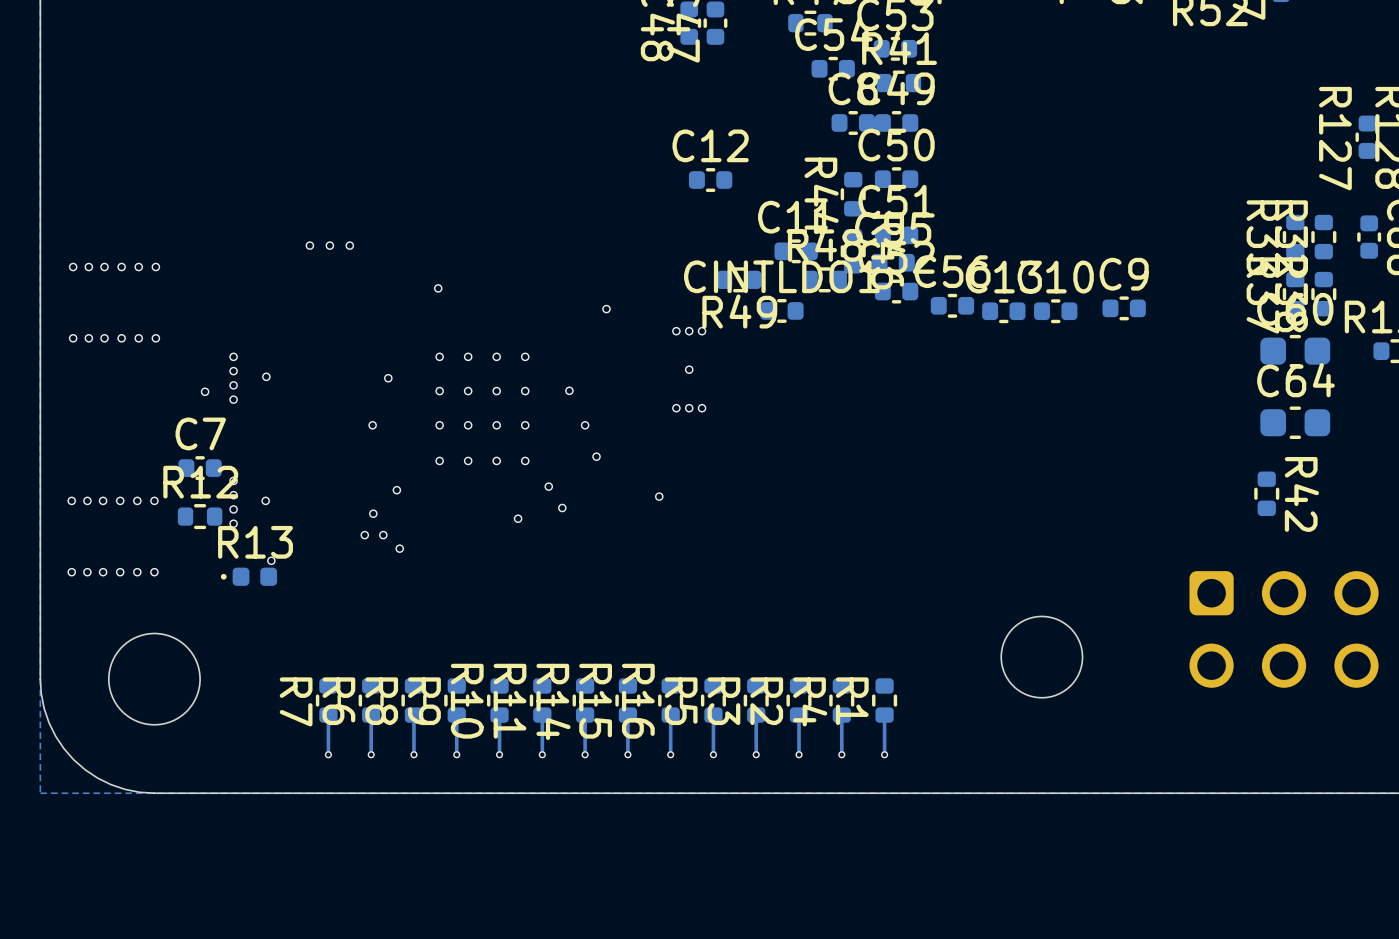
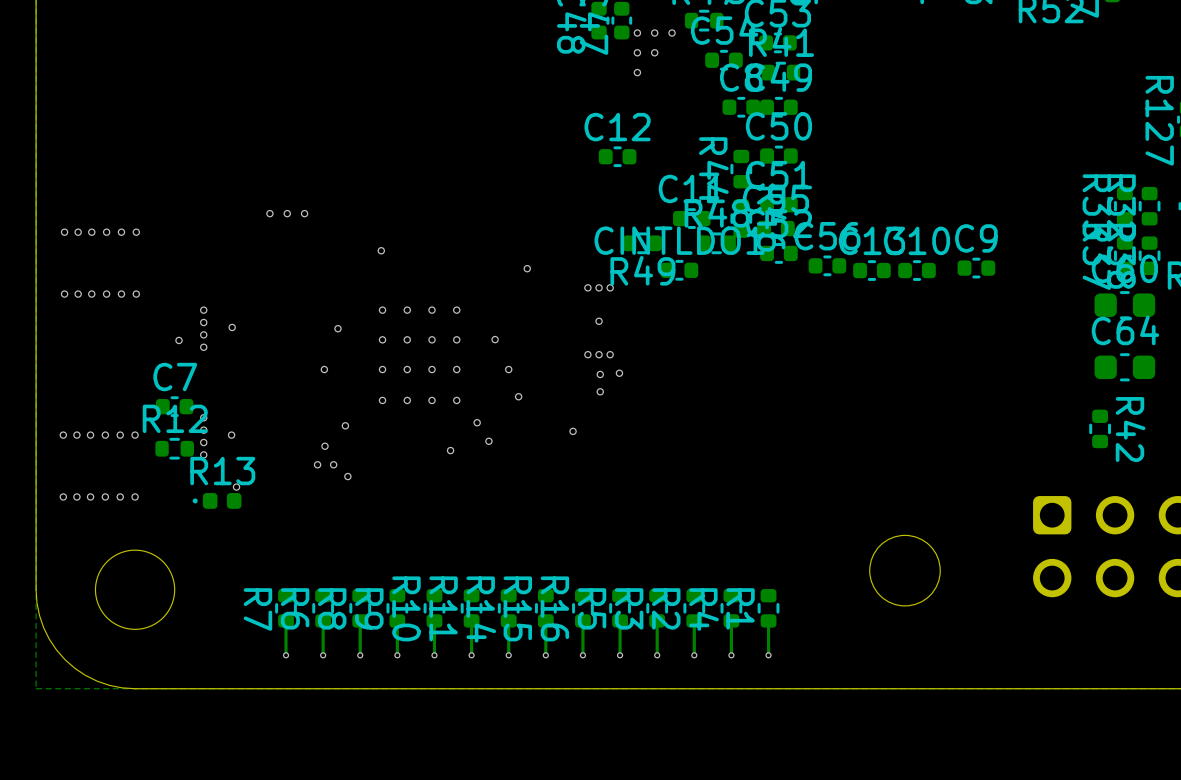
via: none -> (637, 33)
via: none -> (654, 33)
via: none -> (672, 33)
via: none -> (637, 52)
via: none -> (654, 52)
via: none -> (637, 72)
via: none -> (619, 373)
via: none -> (600, 374)
via: none -> (600, 391)

